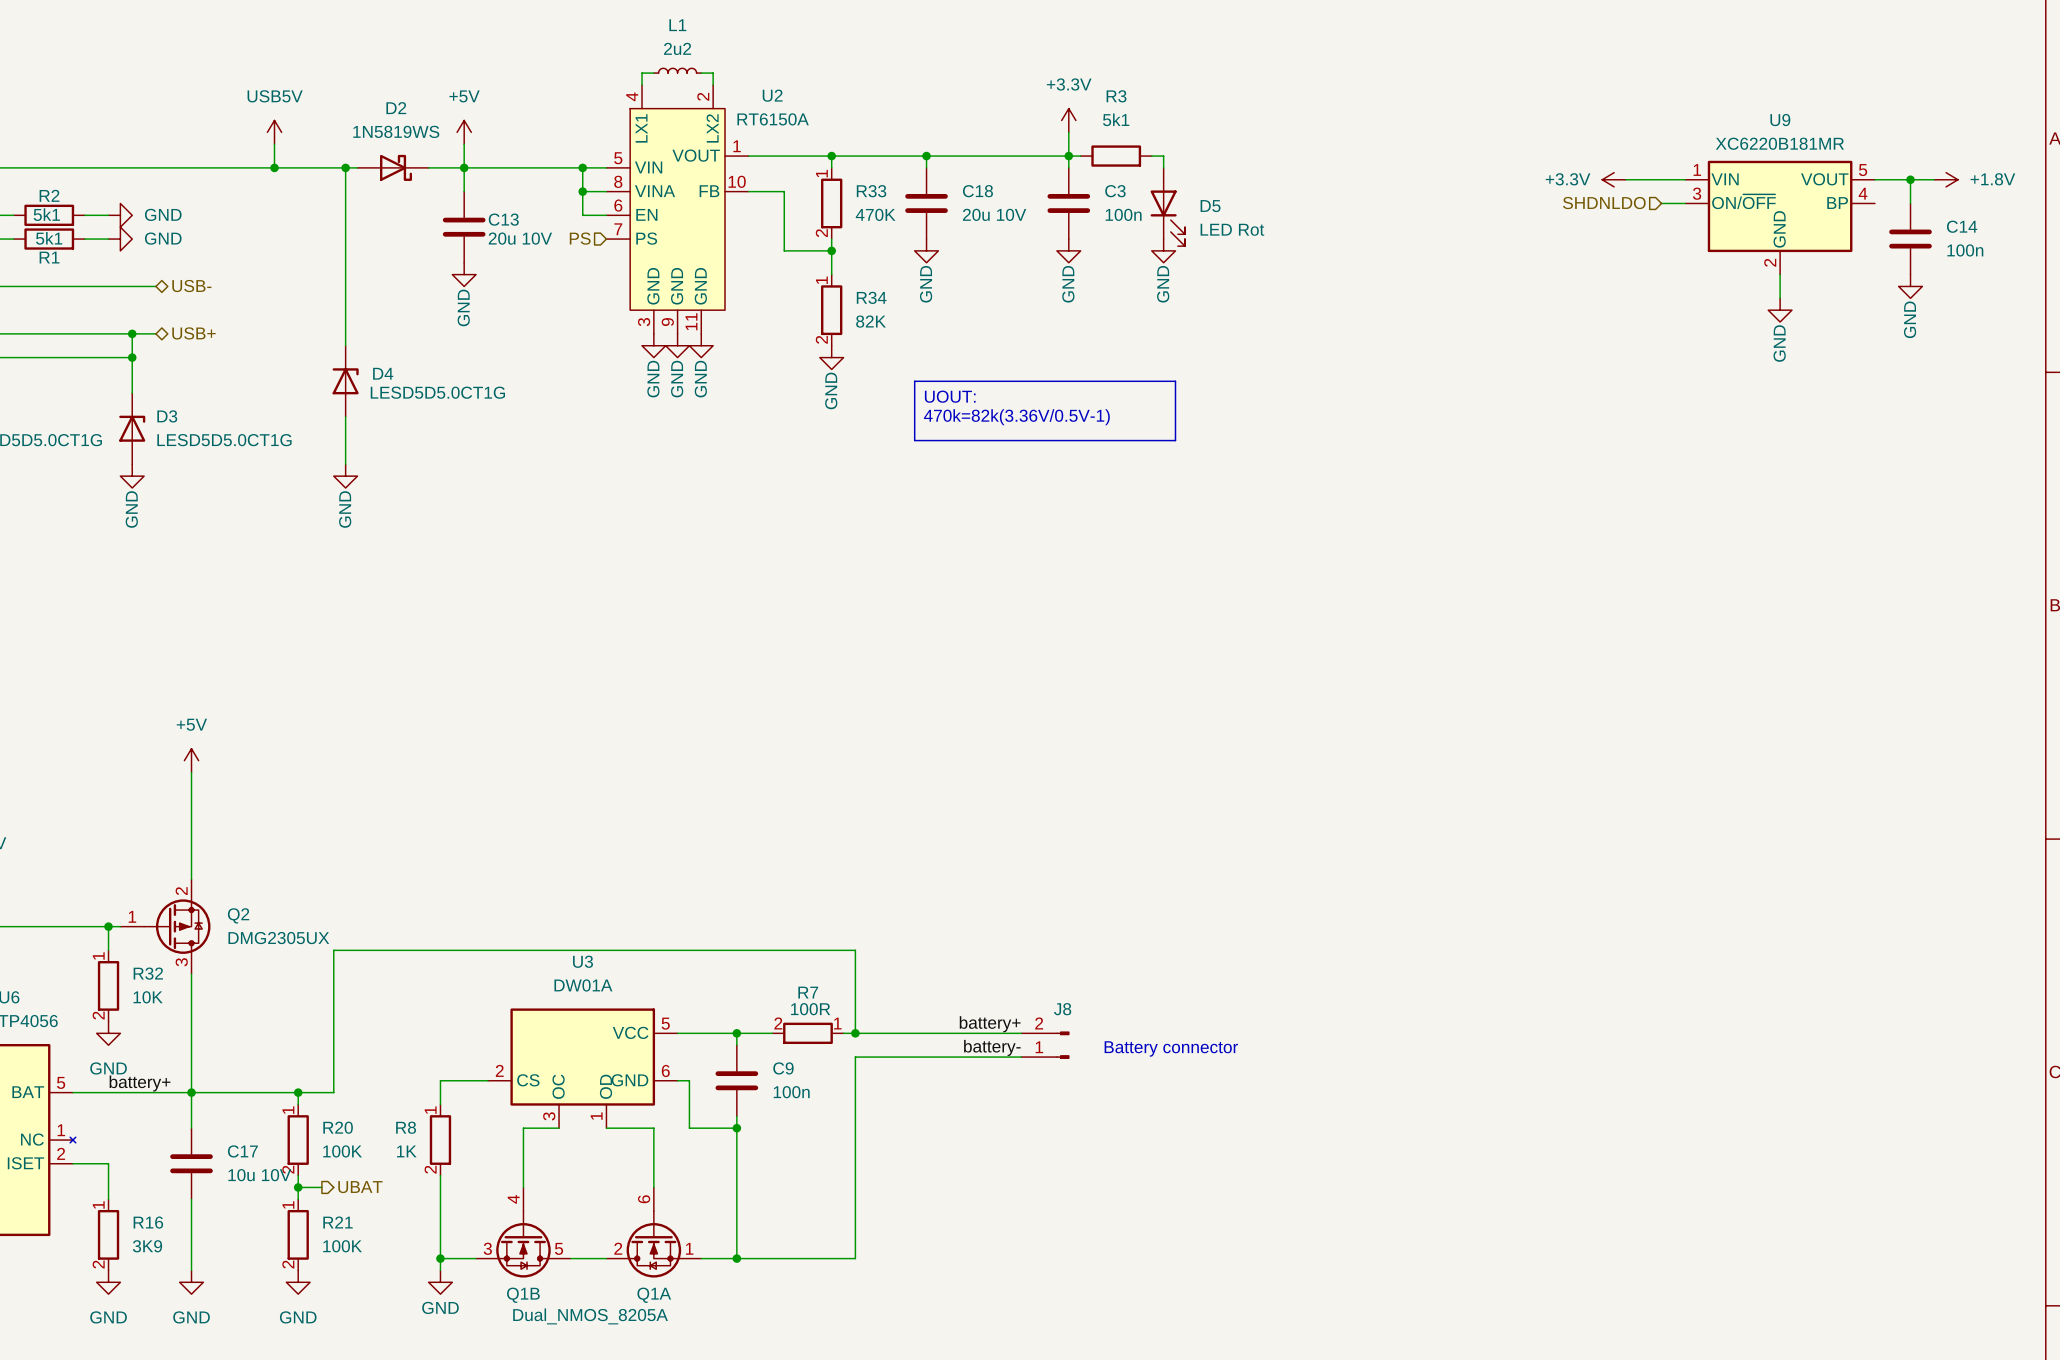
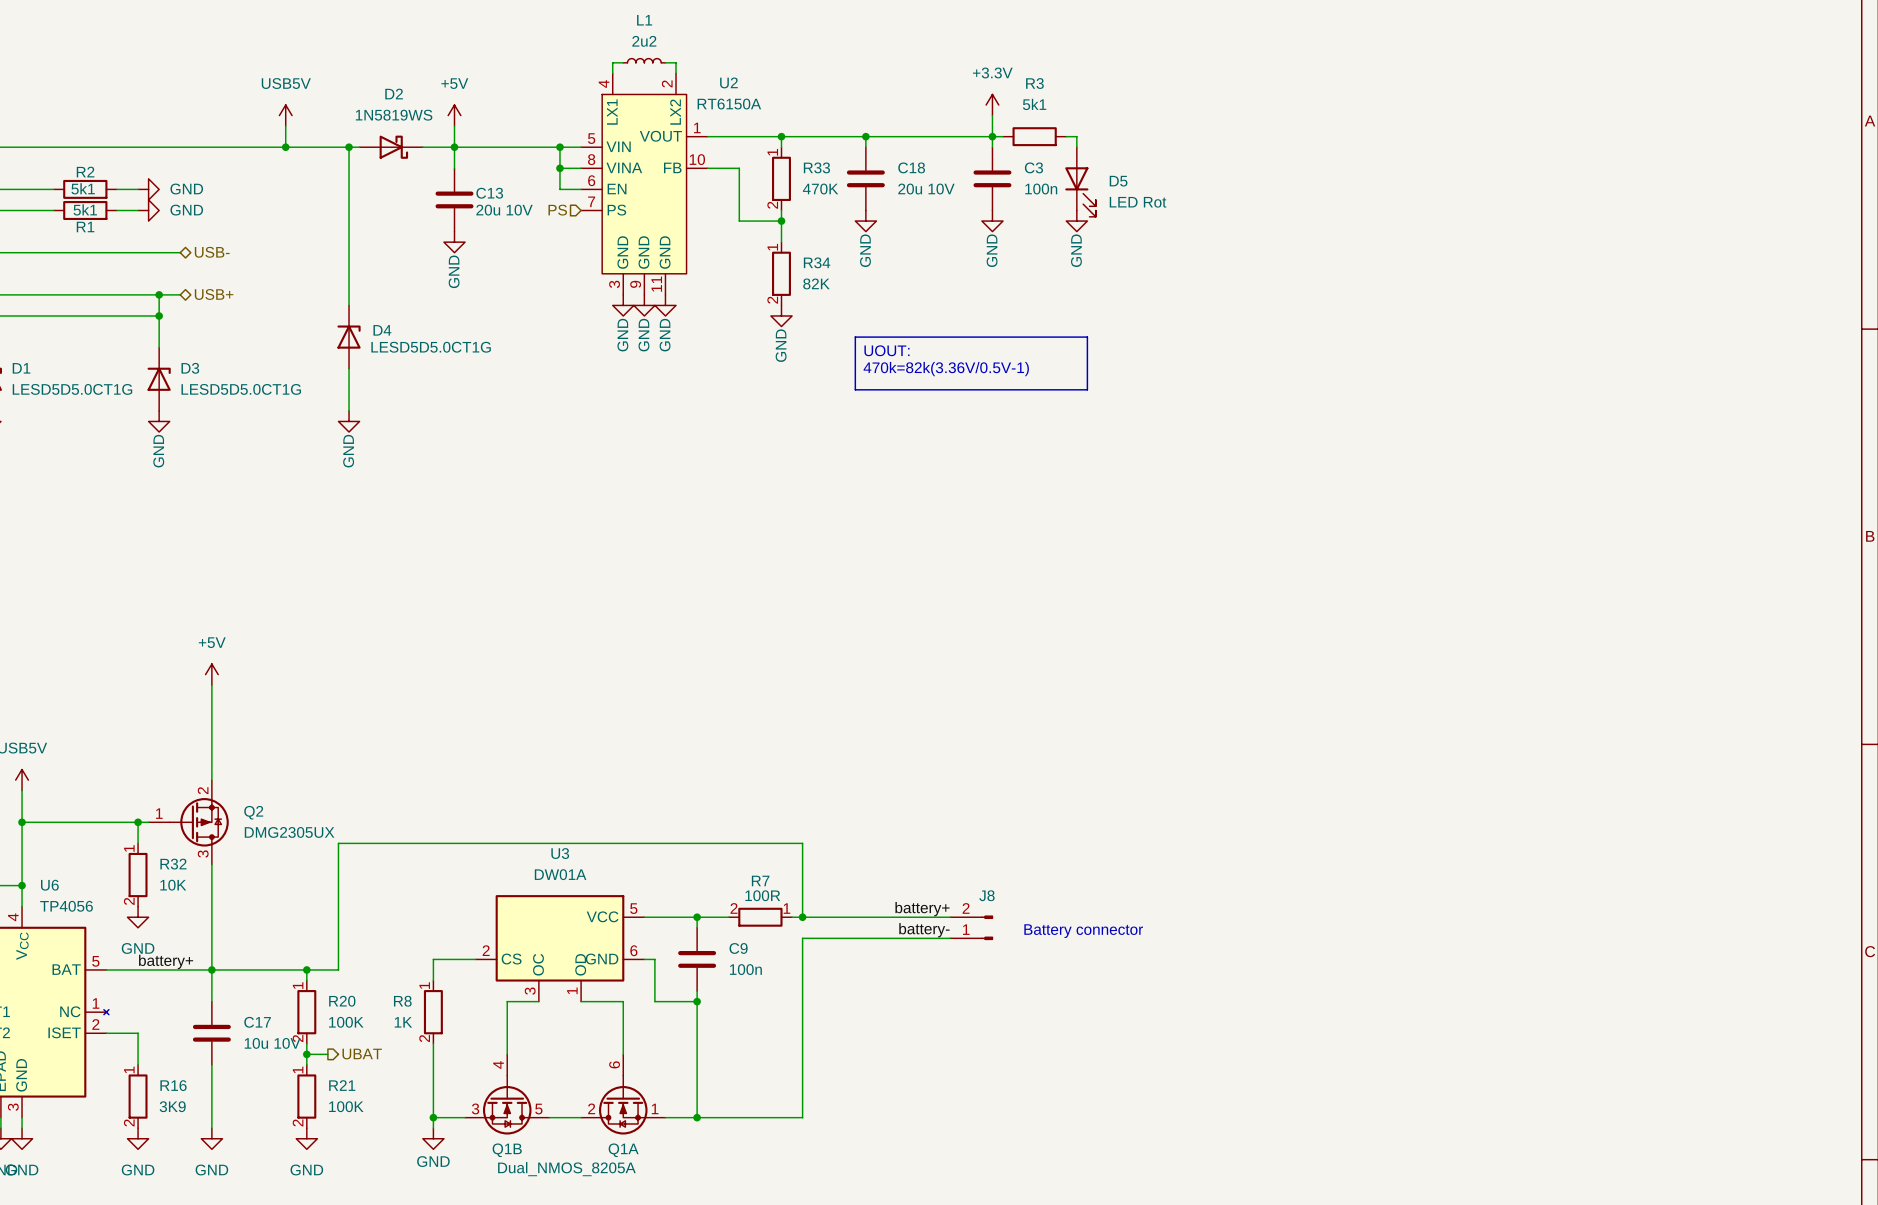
power symbol: +3.3V (1614, 179) -> none
wire: (1625, 179) (1685, 179) -> none
wire: (1874, 179) (1934, 179) -> none
wire: (1910, 179) (1910, 203) -> none
junction: (1910, 179) -> none
power symbol: +1.8V (1946, 179) -> none
hierarchical label: SHDNLDO (1604, 203) -> none
wire: (1661, 203) (1685, 203) -> none
U9: XC6220B181MR (1780, 217) -> none
C14: 100n (1910, 239) -> none
wire: (1780, 274) (1780, 298) -> none
power symbol: GND (1910, 286) -> none
power symbol: GND (1780, 310) -> none

